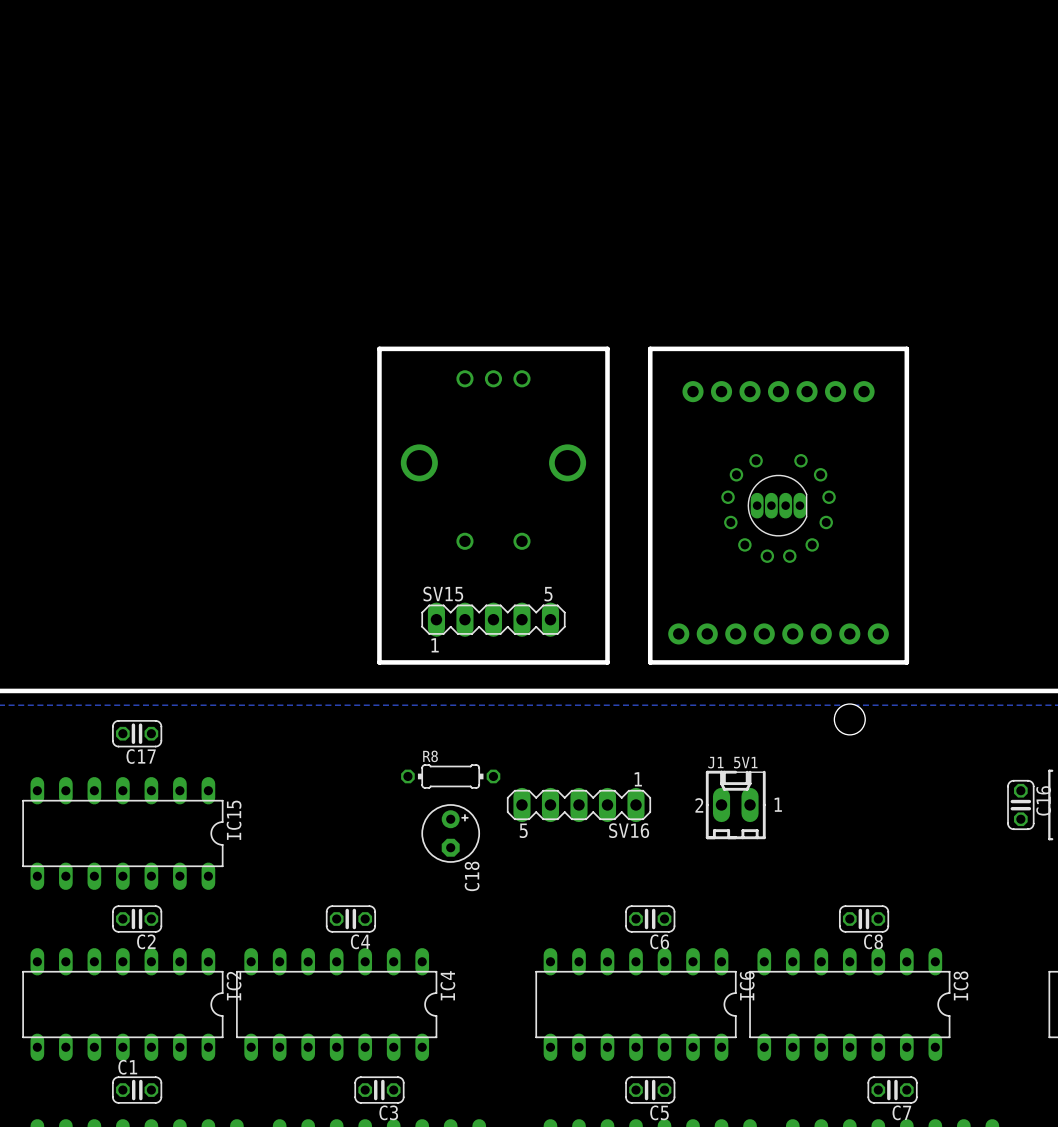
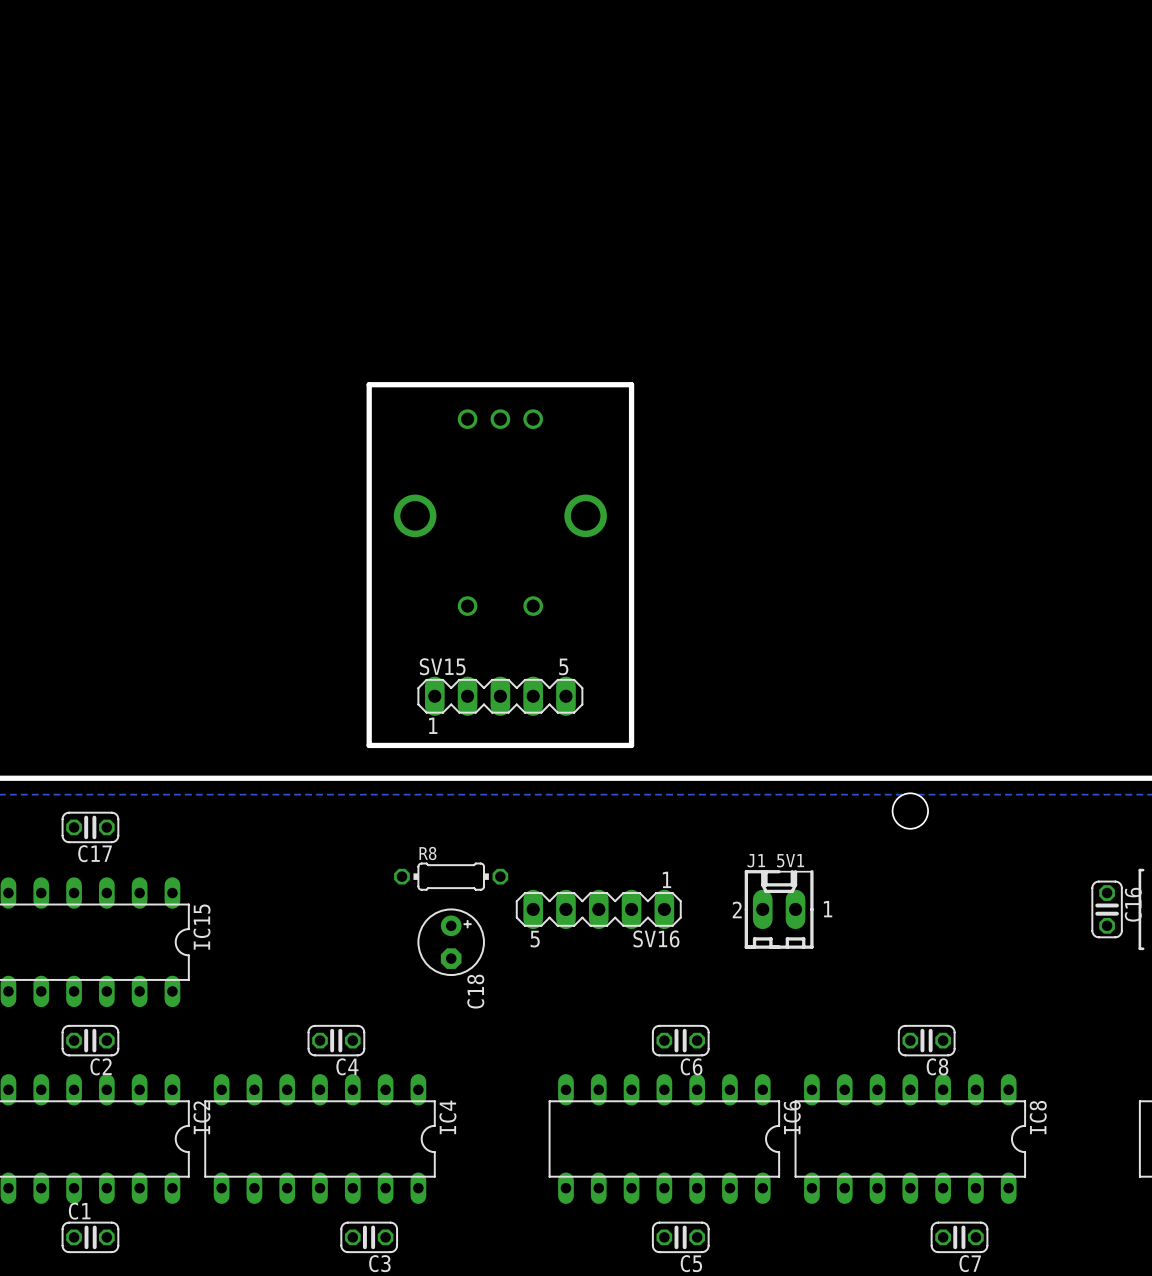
board edge: (650, 348) (650, 662) (906, 662) (906, 348) (650, 348) -> none
part: (778, 391) -> none
part: (777, 505) -> none
part: (778, 508) -> none
part: (778, 633) -> none

